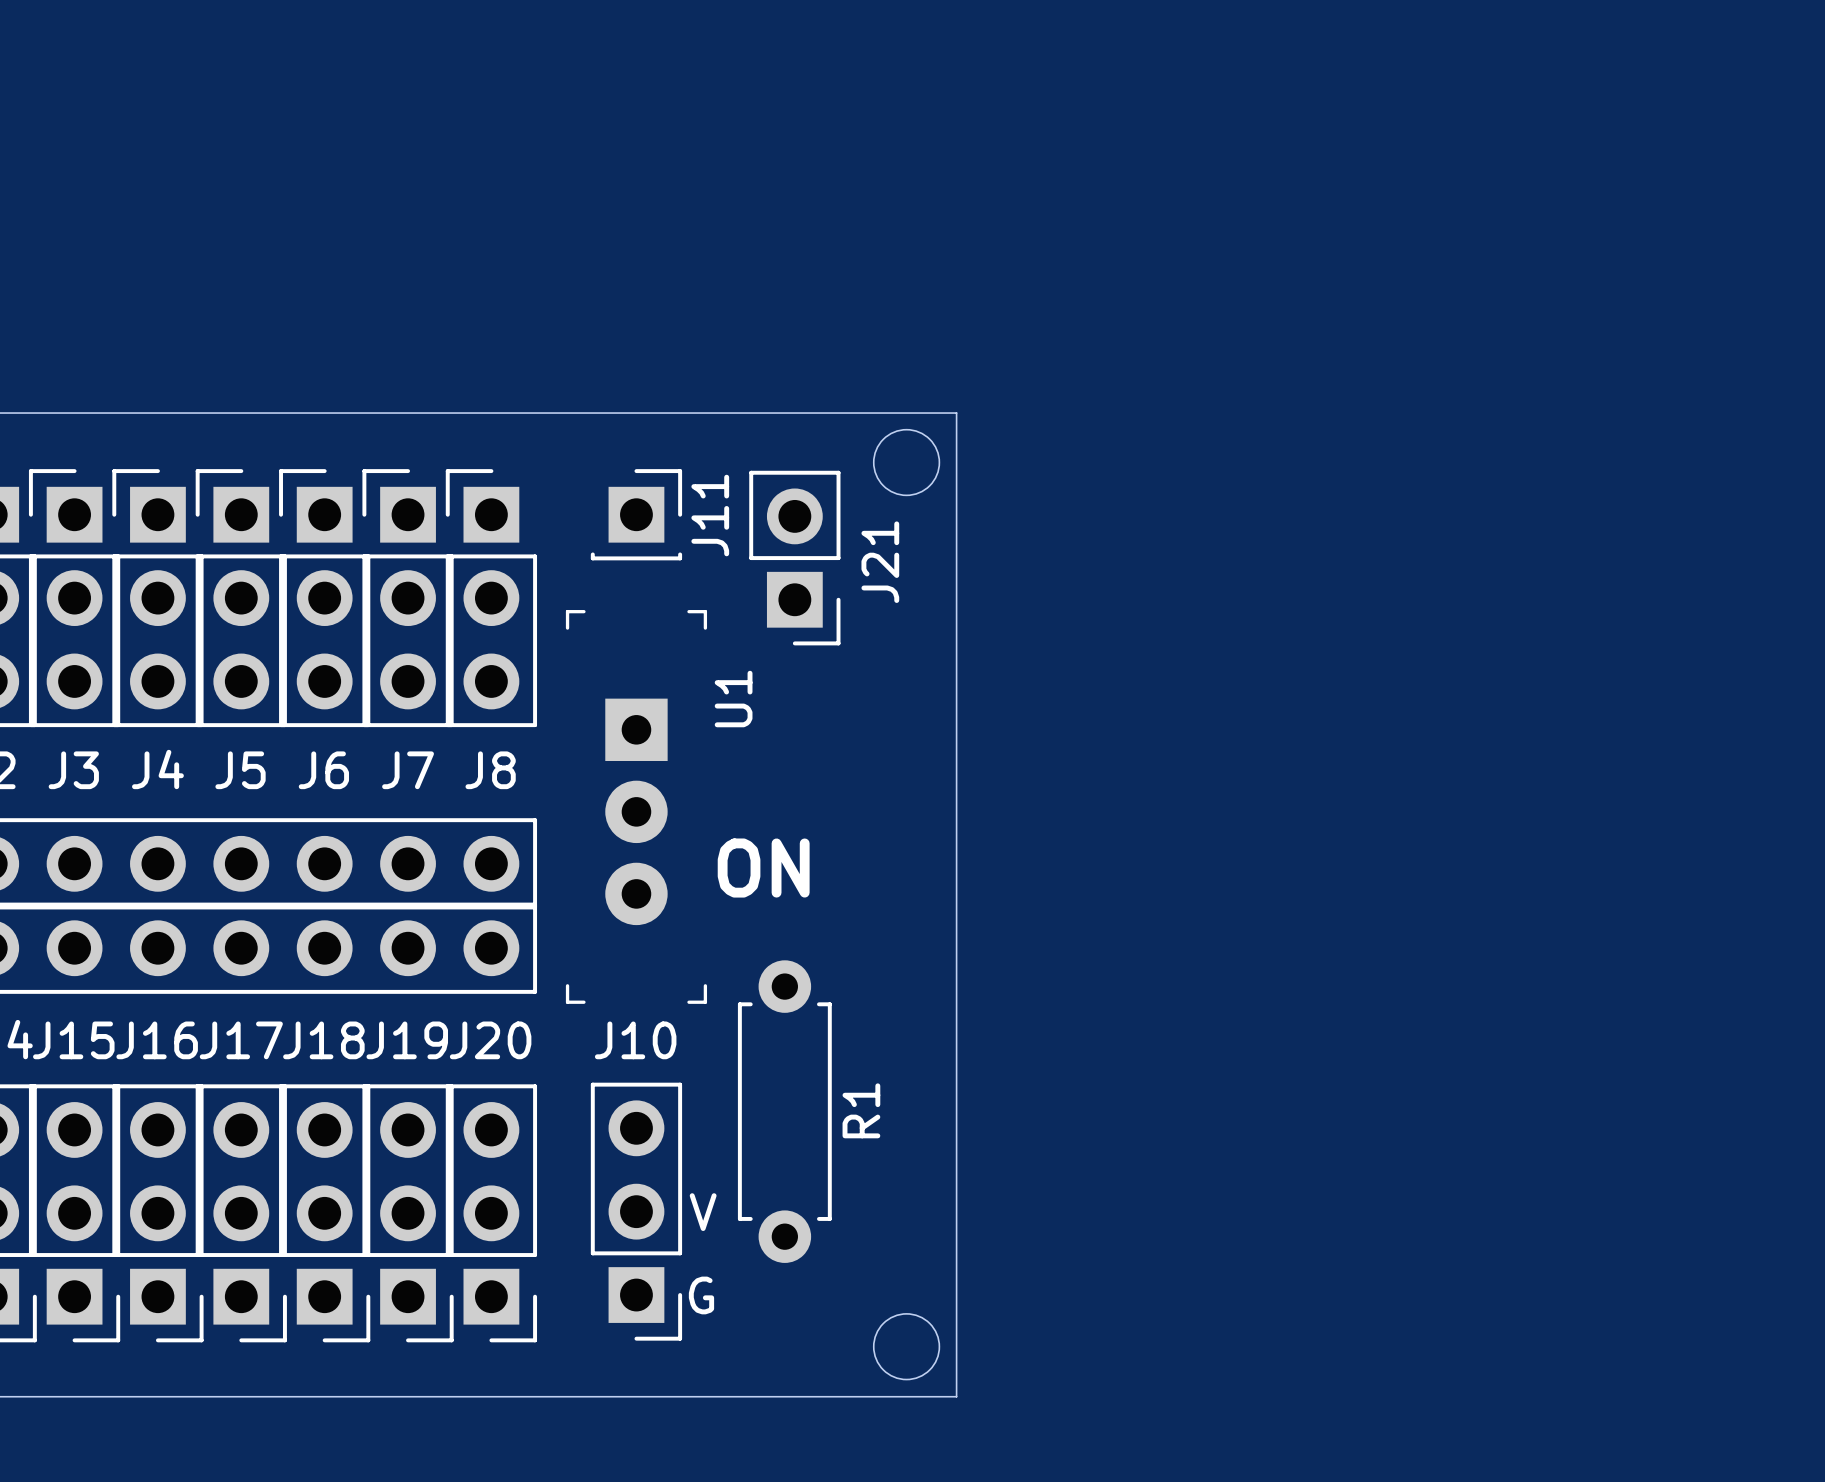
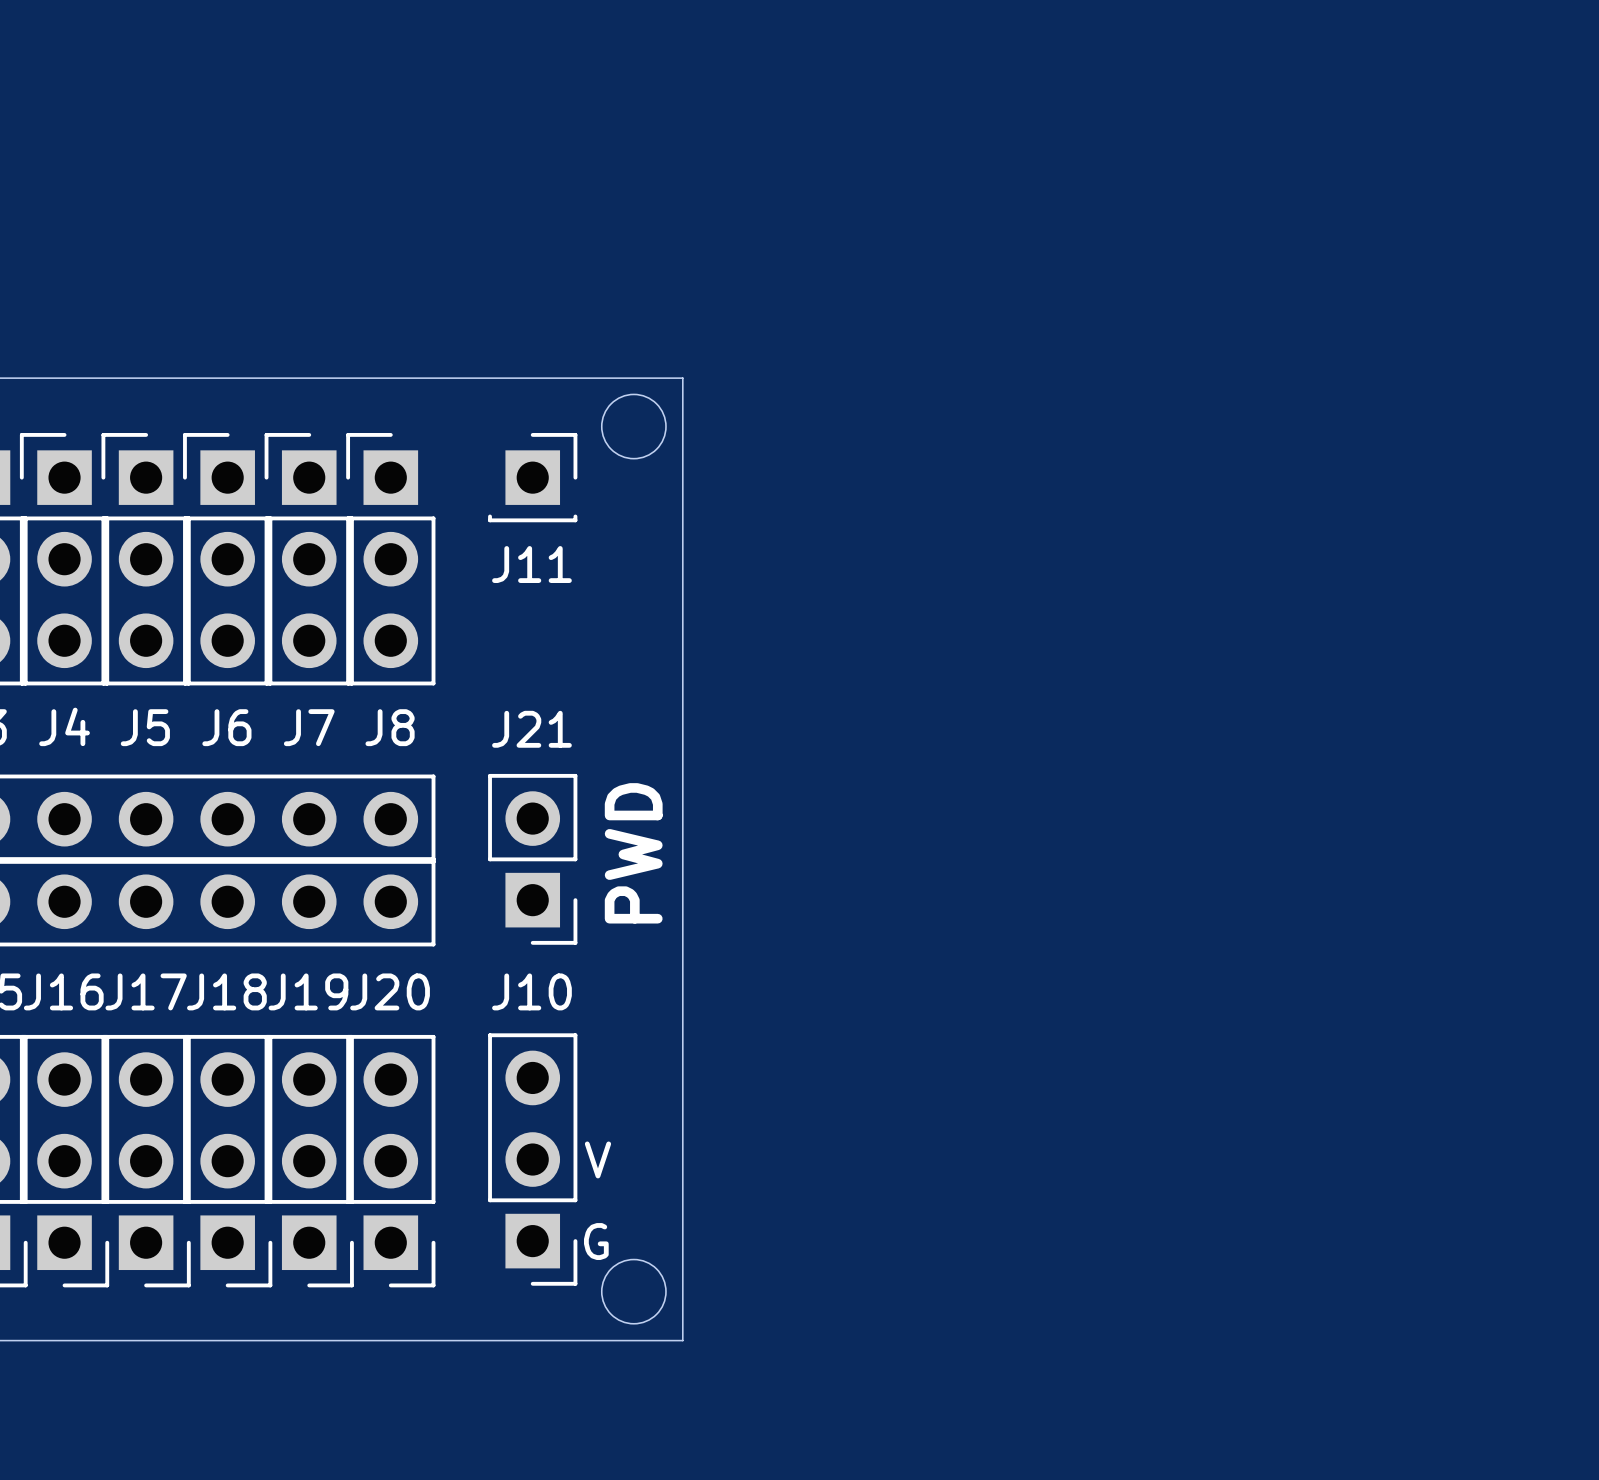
board edge: (789, 413) (956, 413) (956, 1396) (789, 1396) -> (682, 378) (682, 1340)
round board edge position: (906, 462) -> (633, 426)
J11 name rotation: 0° (710, 515) -> 90° clockwise (531, 564)
J11 name position: J11 (710, 515) -> J11 (531, 564)
J21 position: (794, 558) -> (532, 859)
J21 name rotation: 0° (880, 562) -> 90° clockwise (531, 729)
J21 name position: J21 (880, 562) -> J21 (531, 729)
U1: (636, 806) -> none
text: ON (763, 868) -> none
text: none -> PWD (633, 853)
R1: (784, 1111) -> none
round board edge position: (906, 1346) -> (633, 1291)

